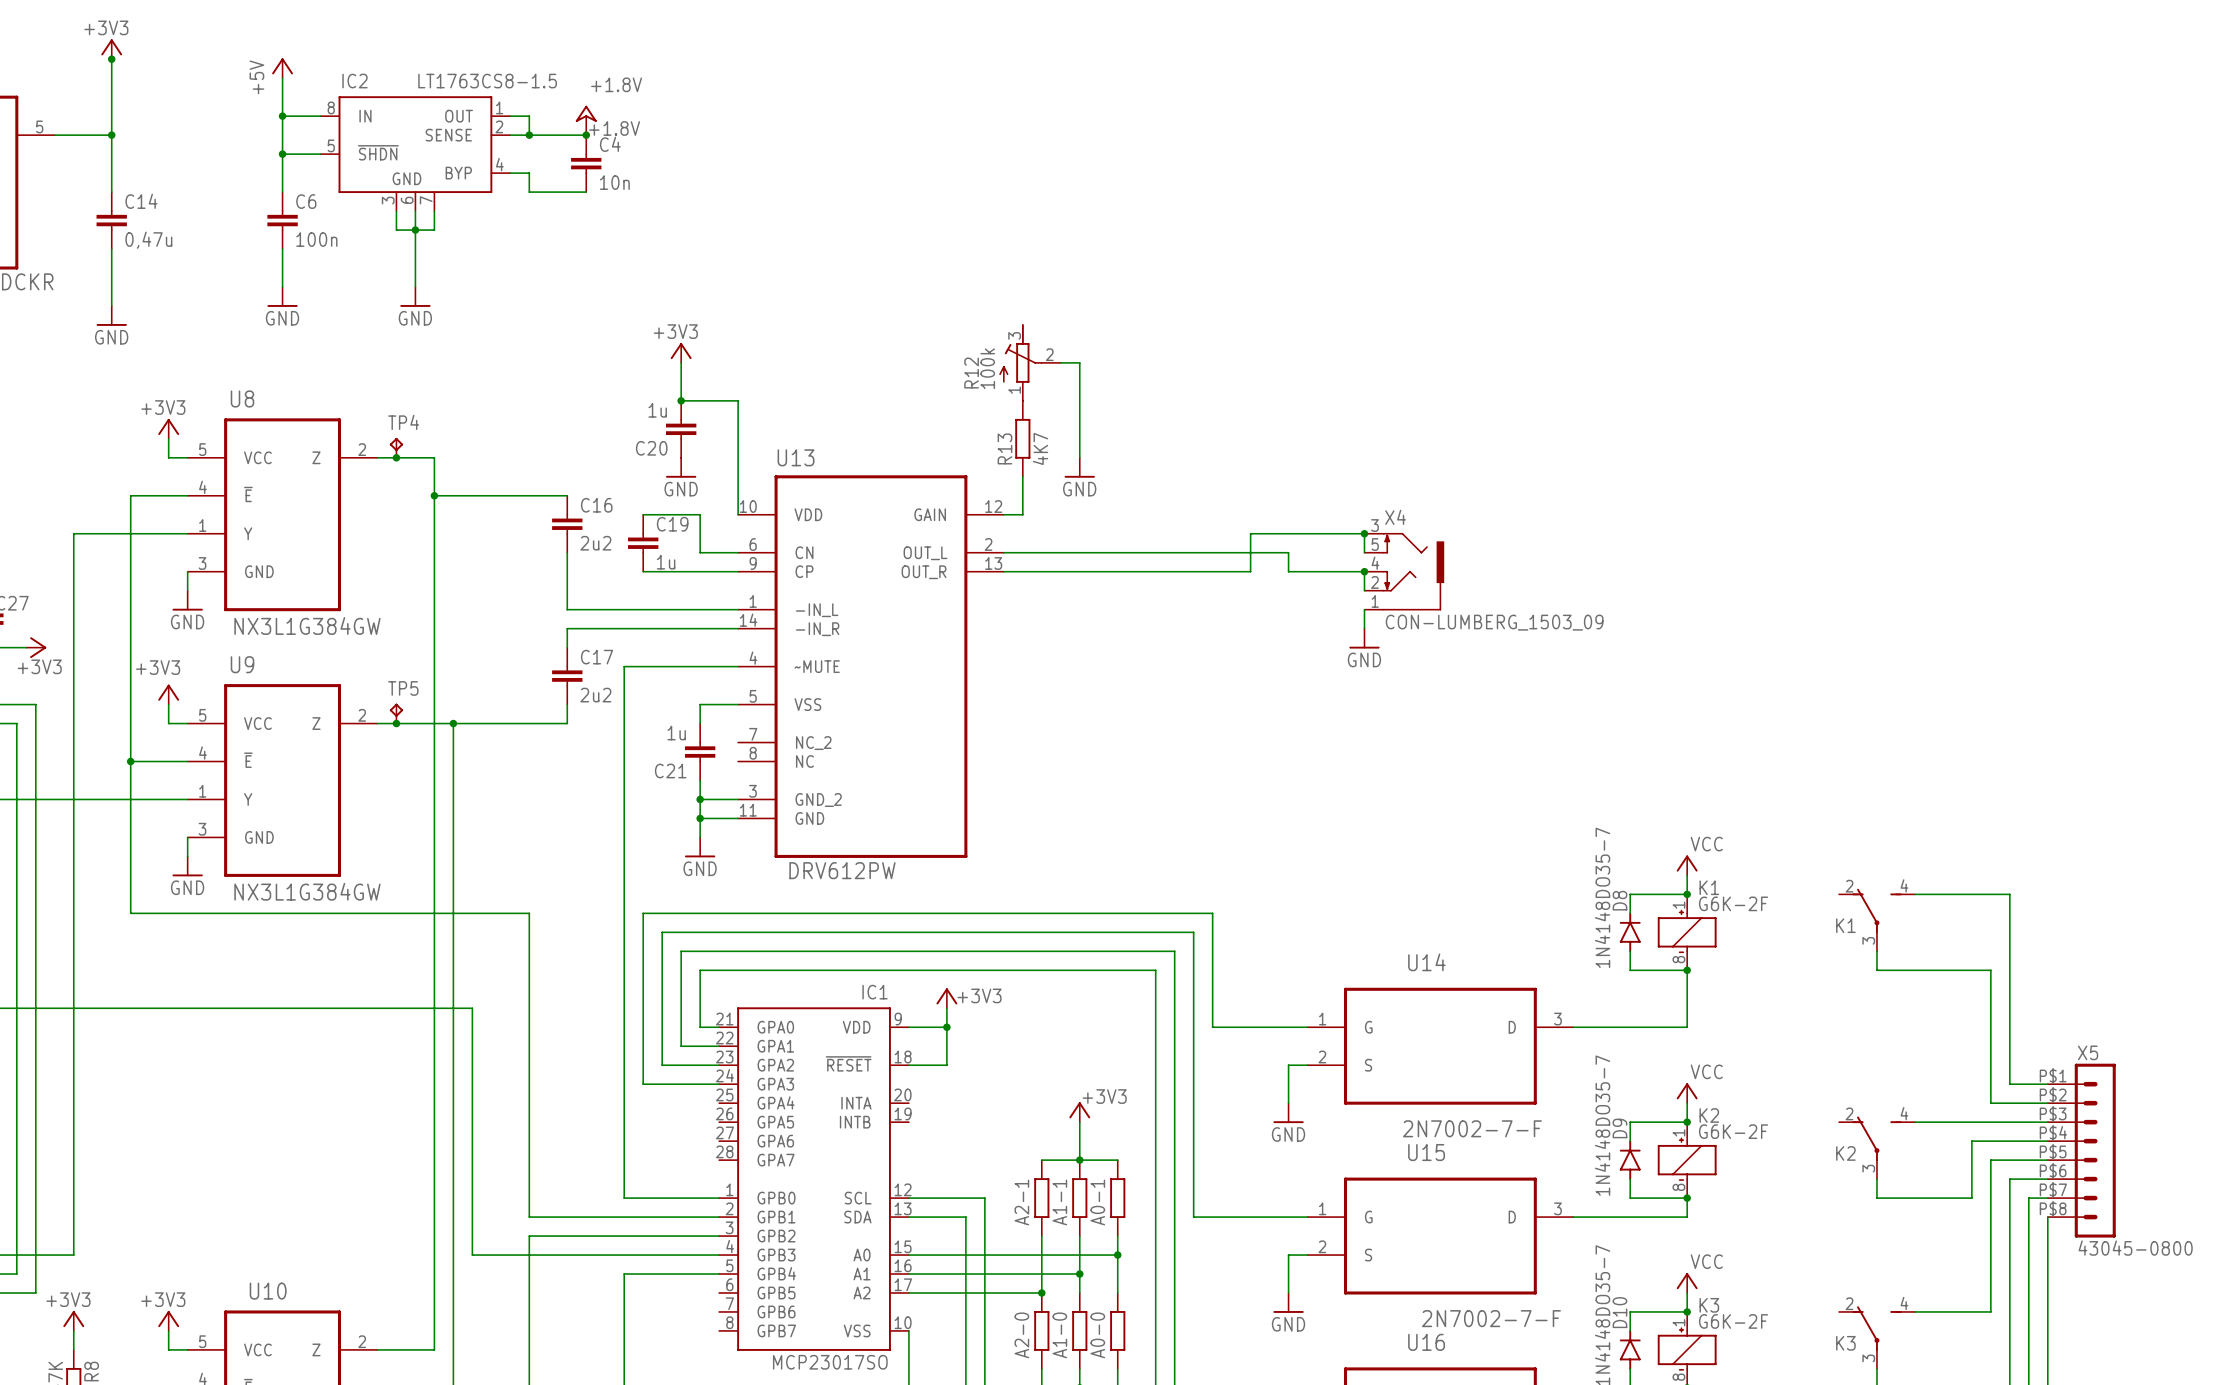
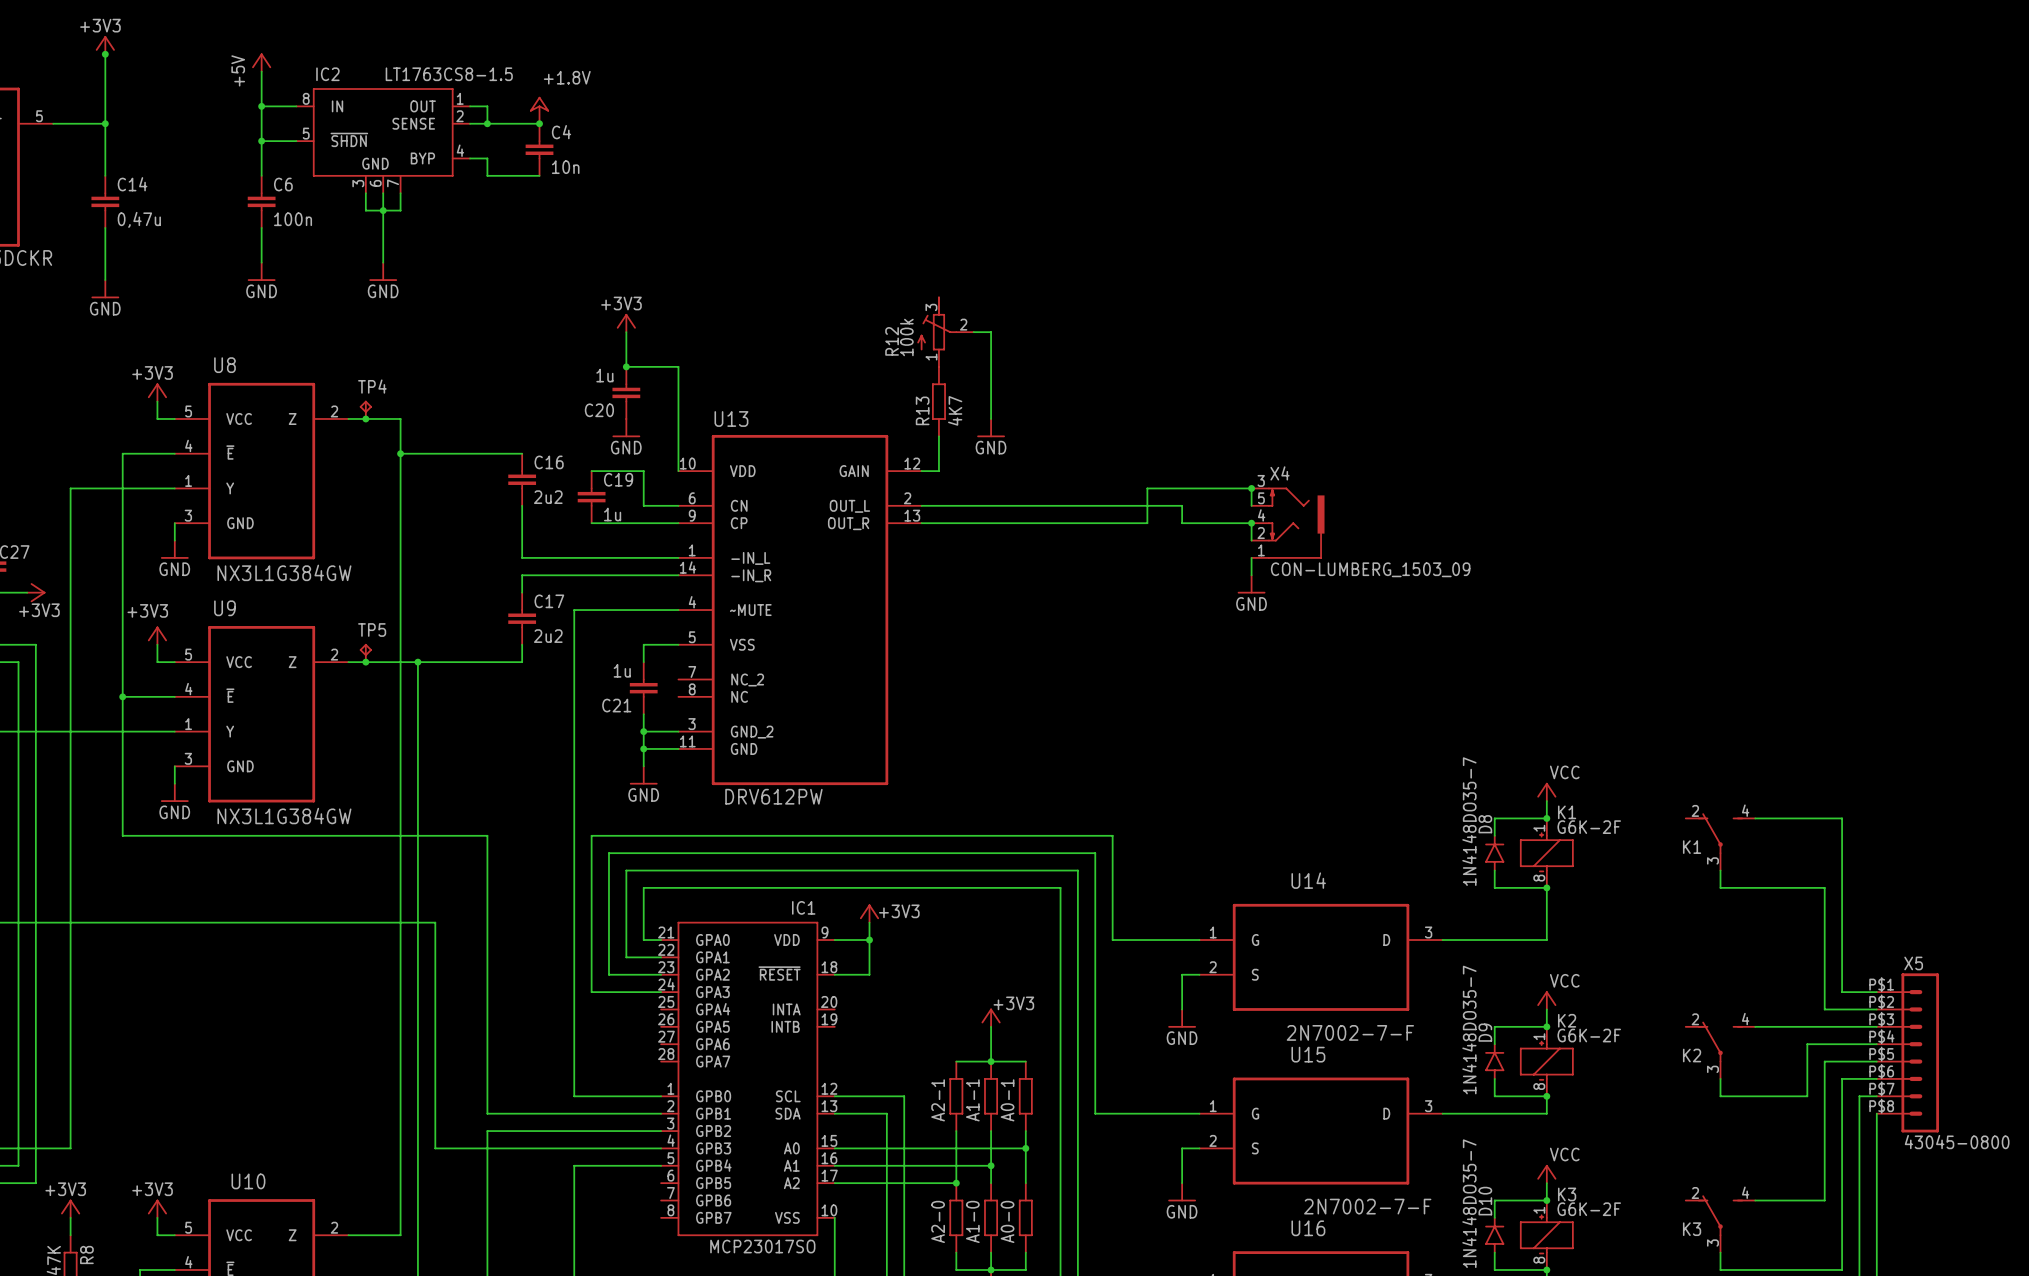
label: +1.8V (614, 128) -> none

